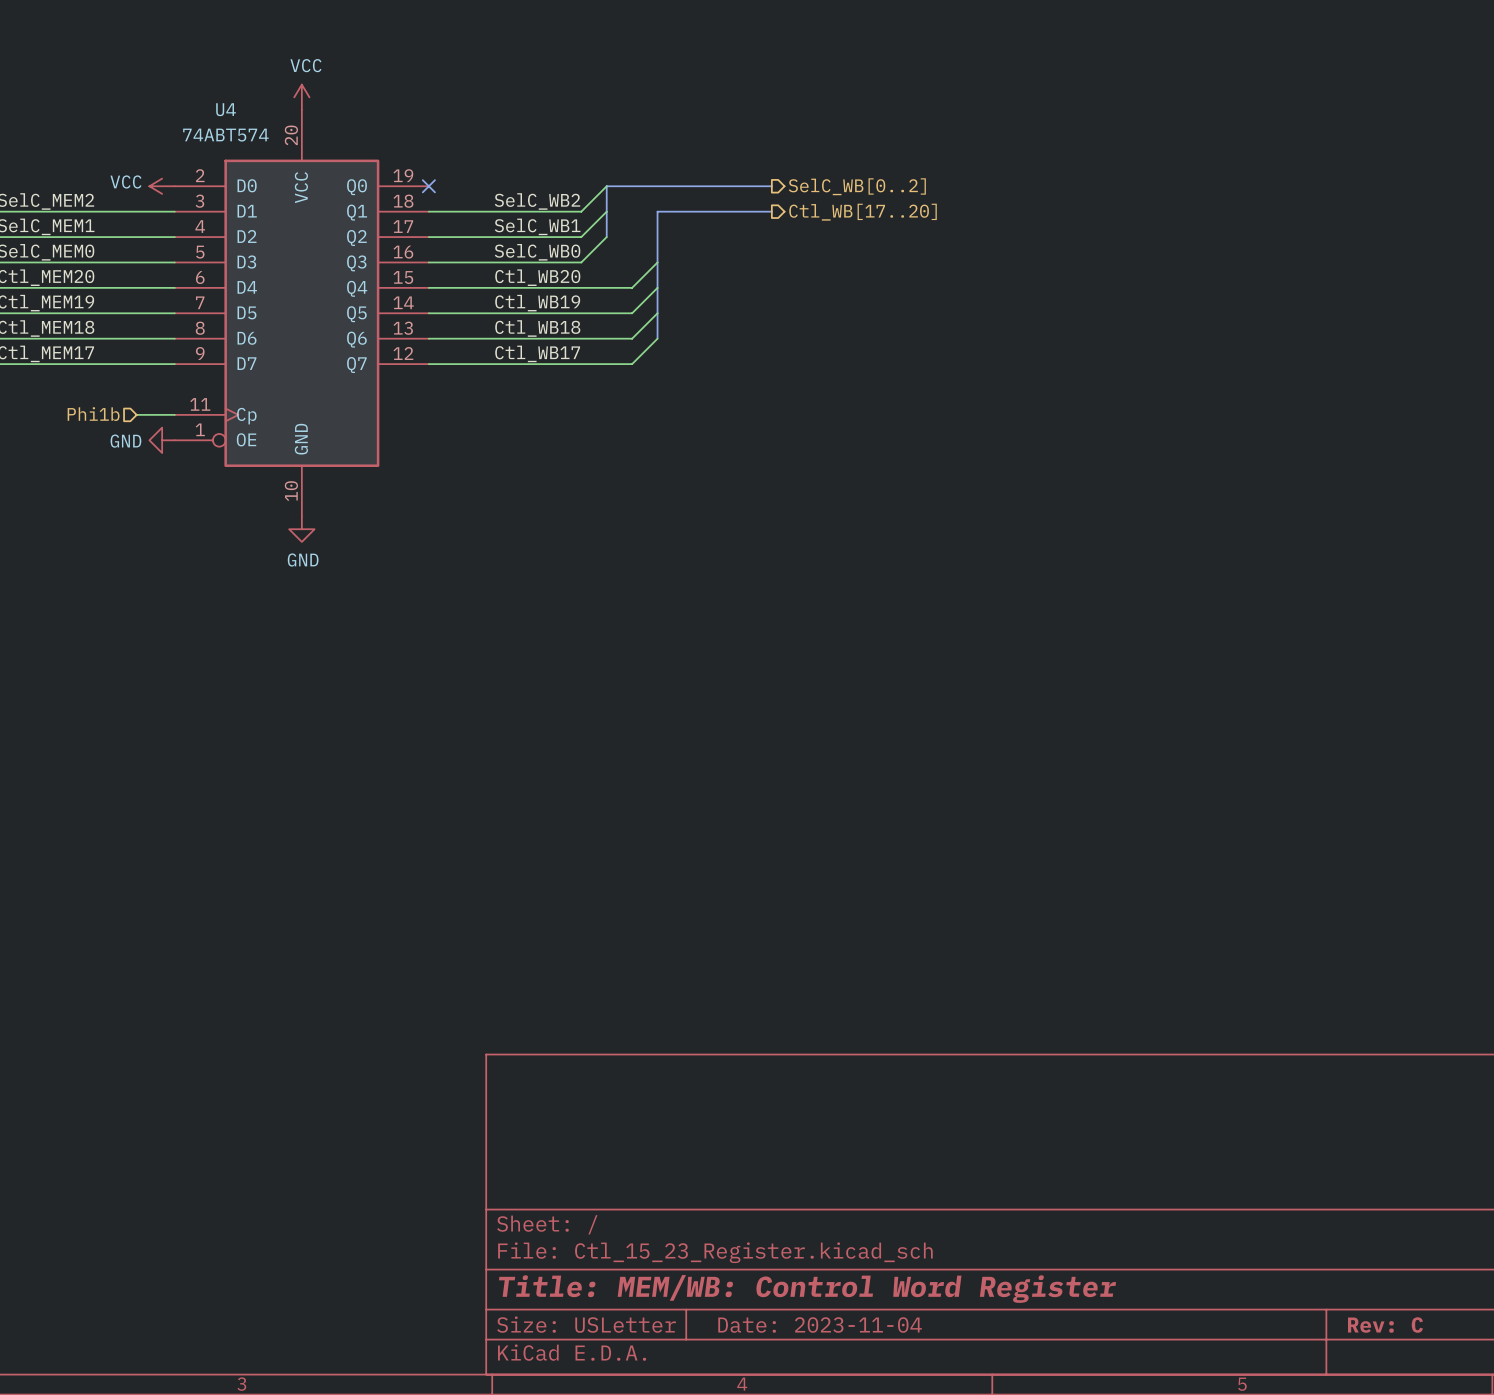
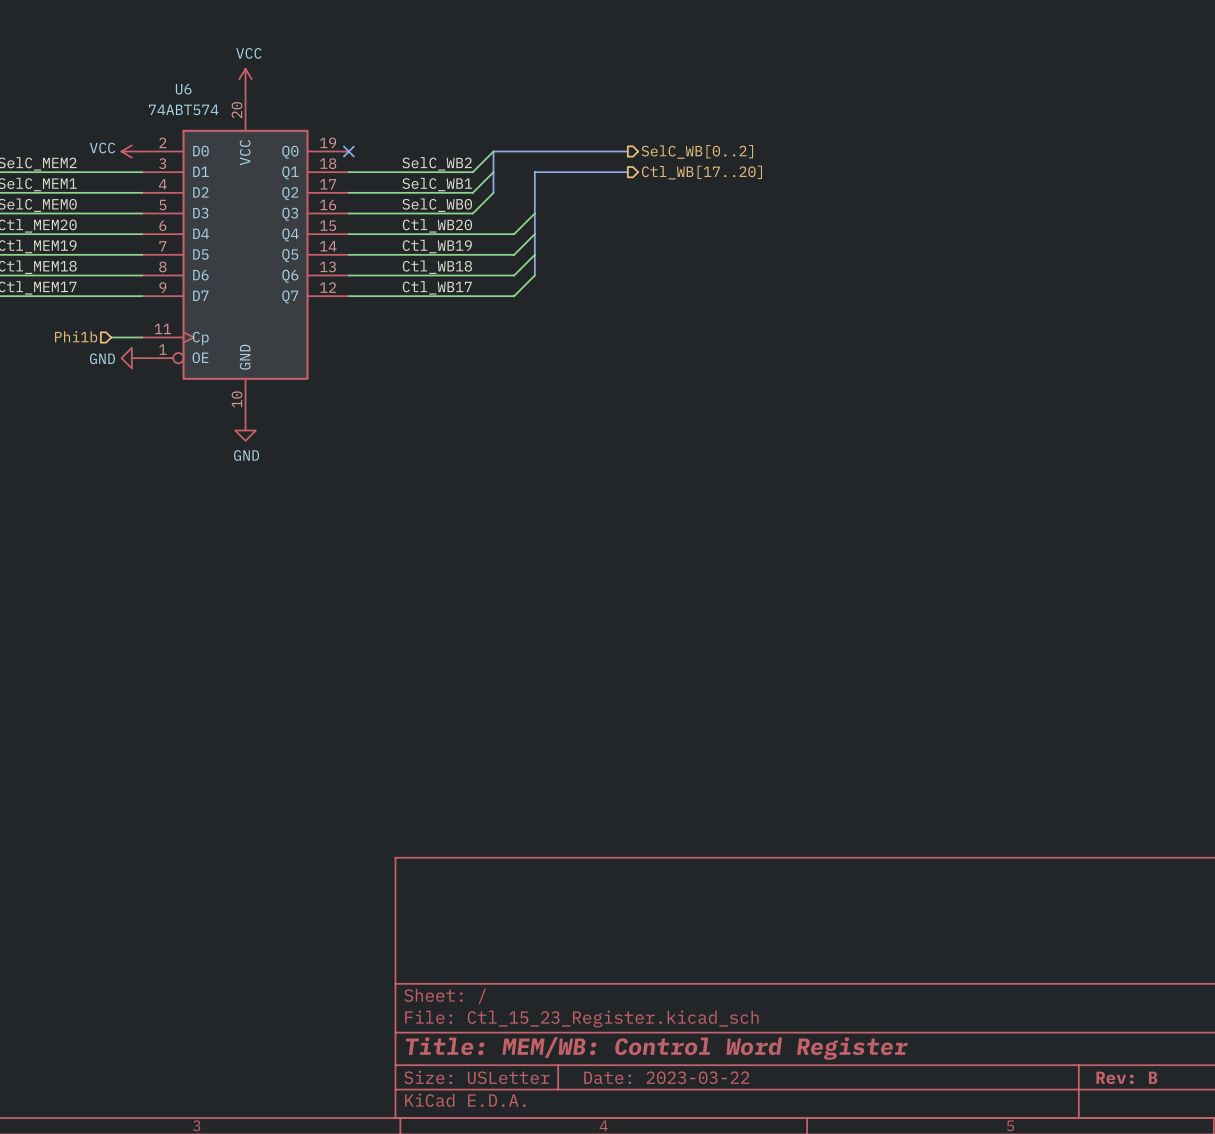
U4 name: U4 (226, 109) -> U6 (183, 89)
title block: Date: 2023-11-04 (820, 1325) -> Date: 2023-03-22 (666, 1077)
title block: Rev: C (1385, 1325) -> Rev: B (1126, 1077)

